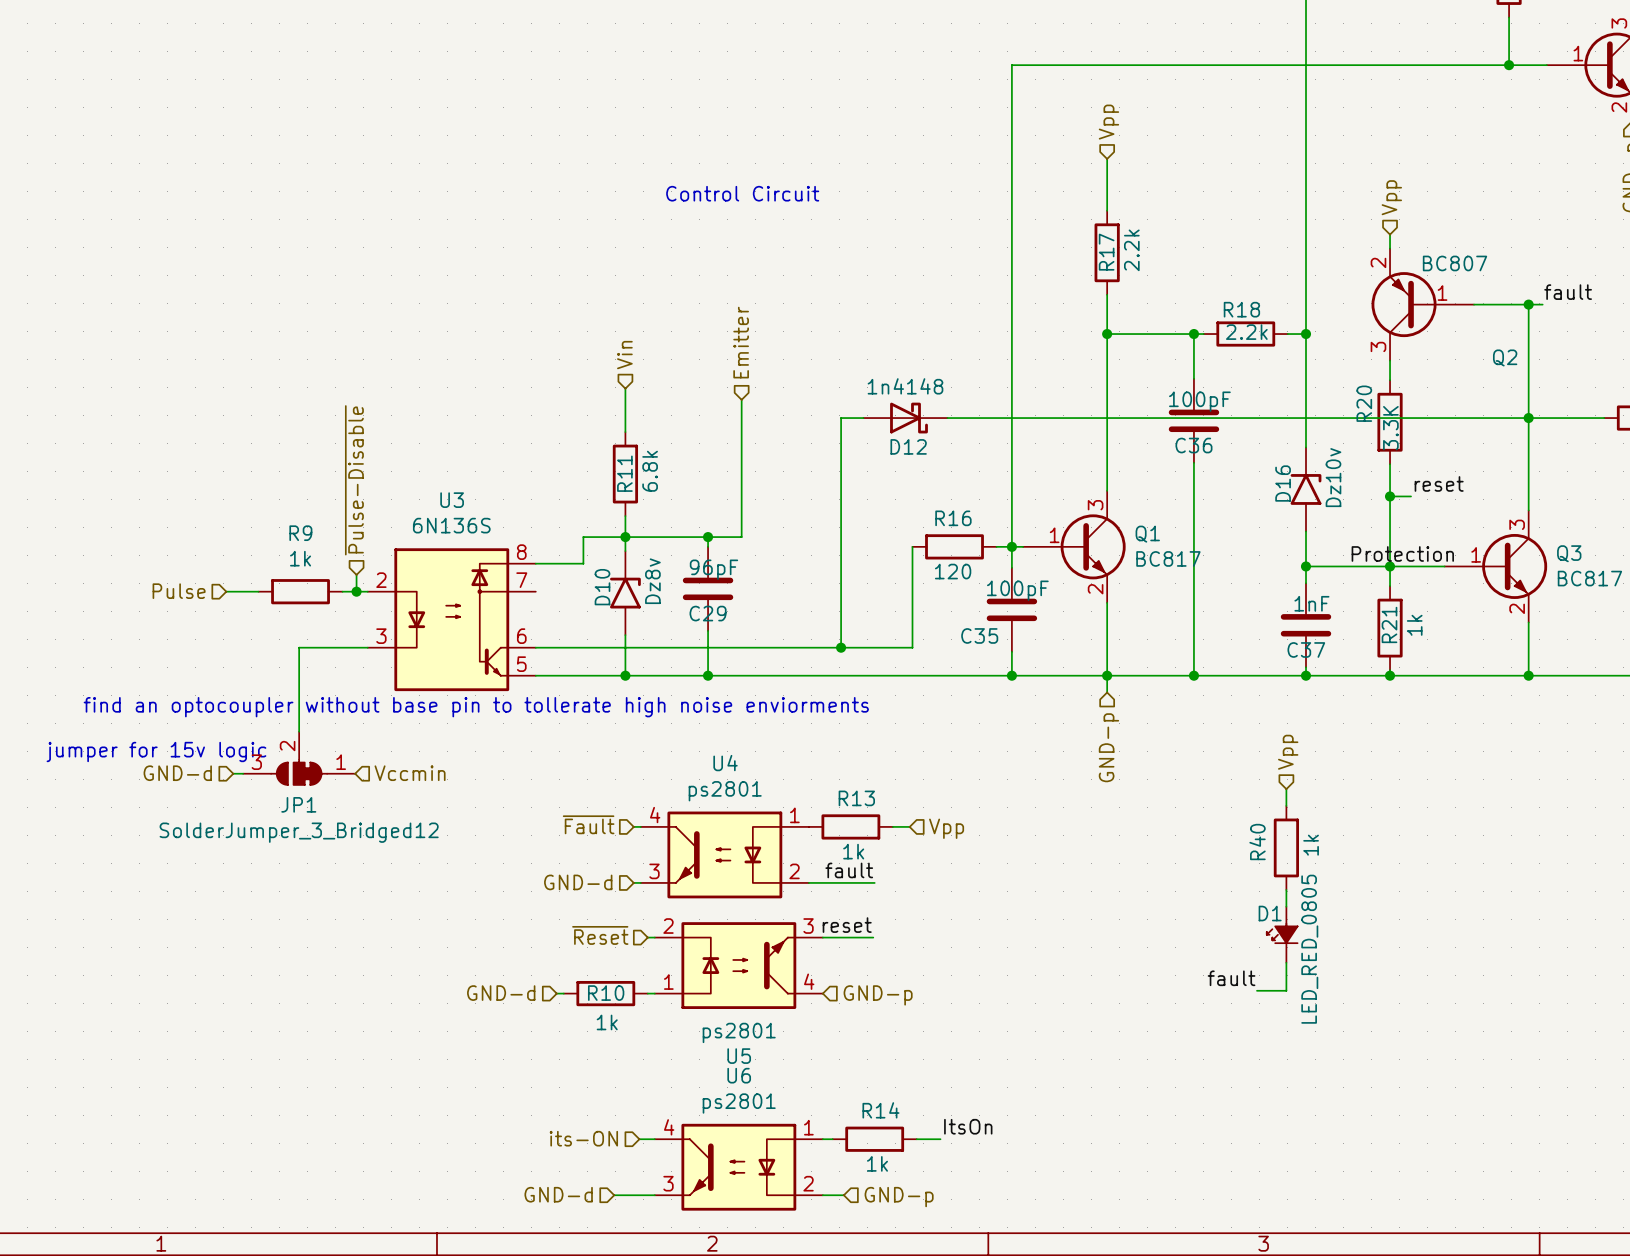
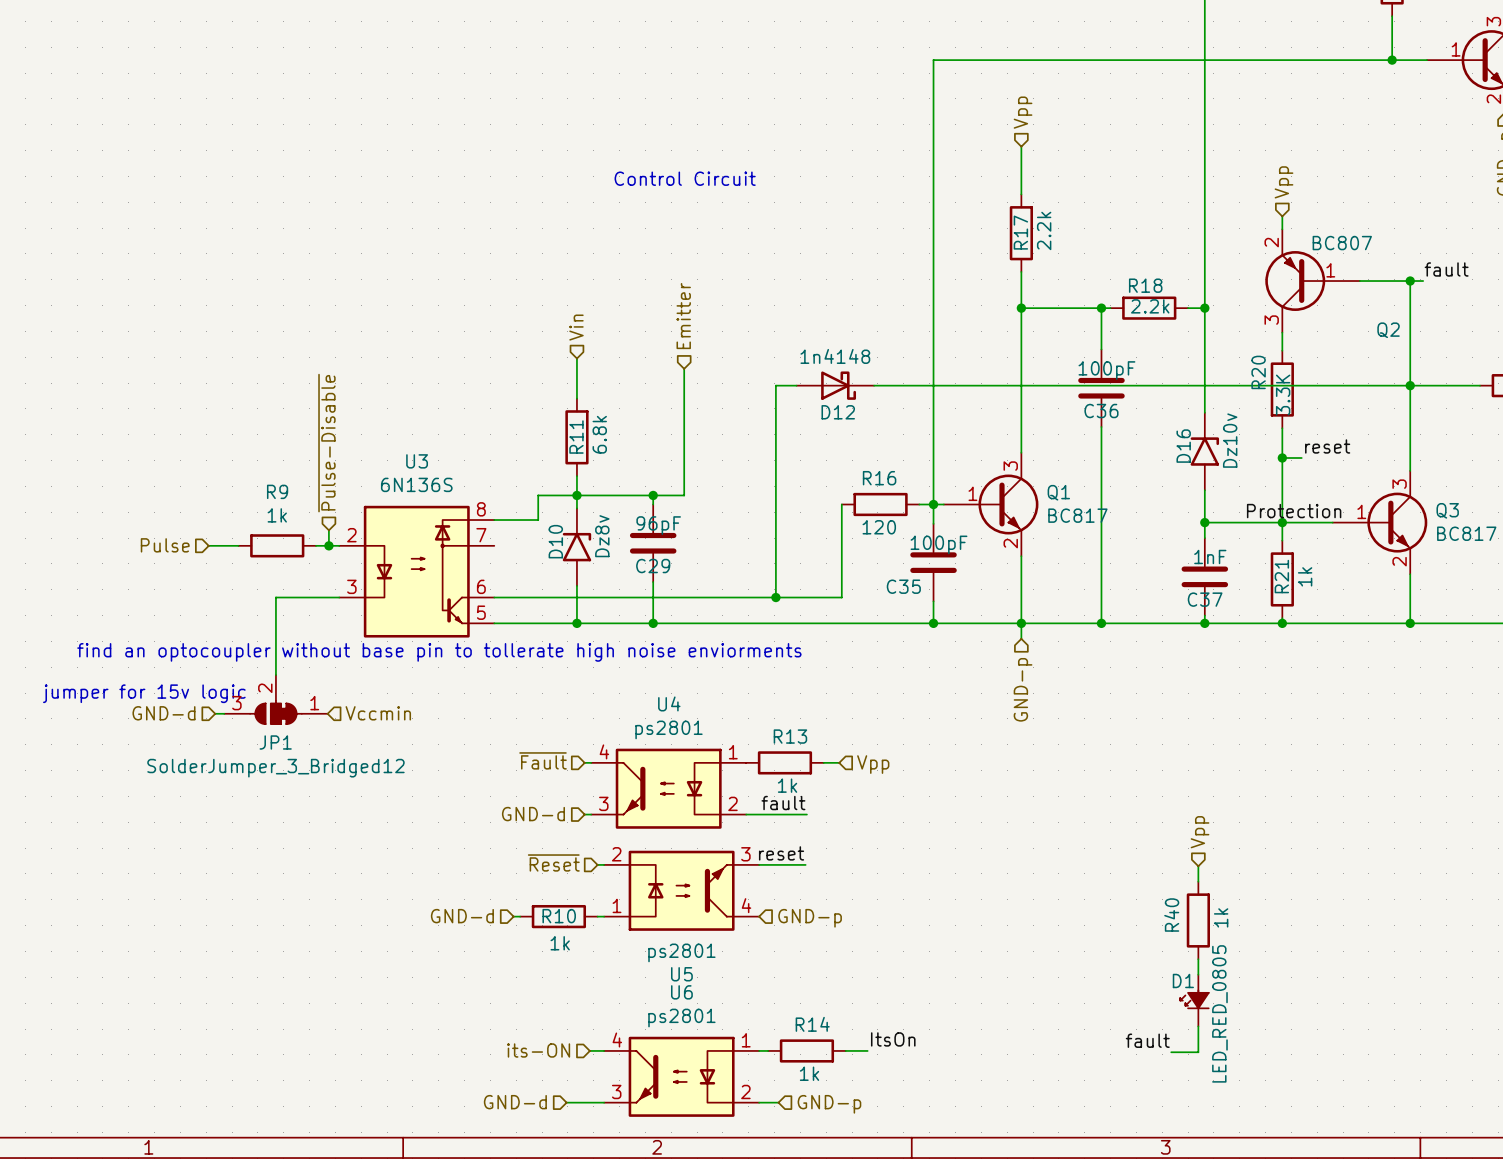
hierarchical label position: Vpp (1288, 752) -> Vpp (1200, 832)
wire: (1286, 789) (1286, 805) -> (1198, 959) (1198, 974)
R40 position: (1286, 847) -> (1198, 920)
wire: (1286, 889) (1286, 906) -> (1198, 866) (1198, 881)
D1 position: (1282, 934) -> (1194, 1000)
wire: (1286, 962) (1286, 990) (1256, 990) -> (1198, 1026) (1198, 1052) (1171, 1052)
label position: fault (1231, 978) -> fault (1147, 1040)

